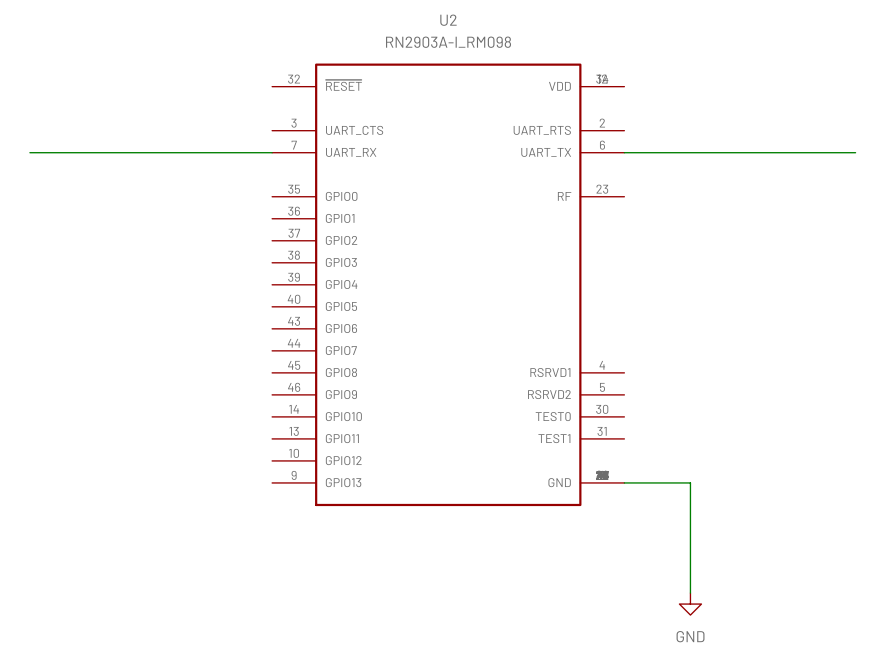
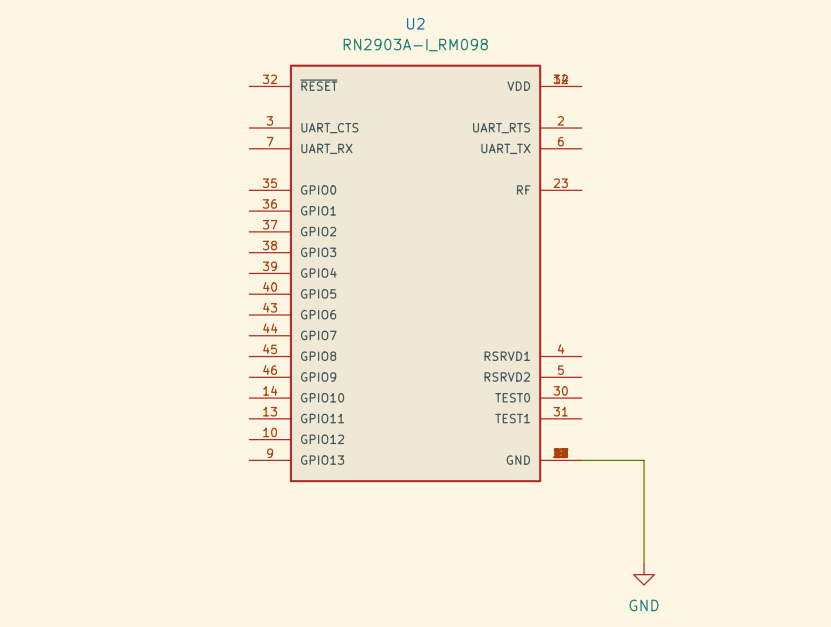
wire: (29, 152) (272, 152) -> none
wire: (624, 152) (855, 152) -> none

